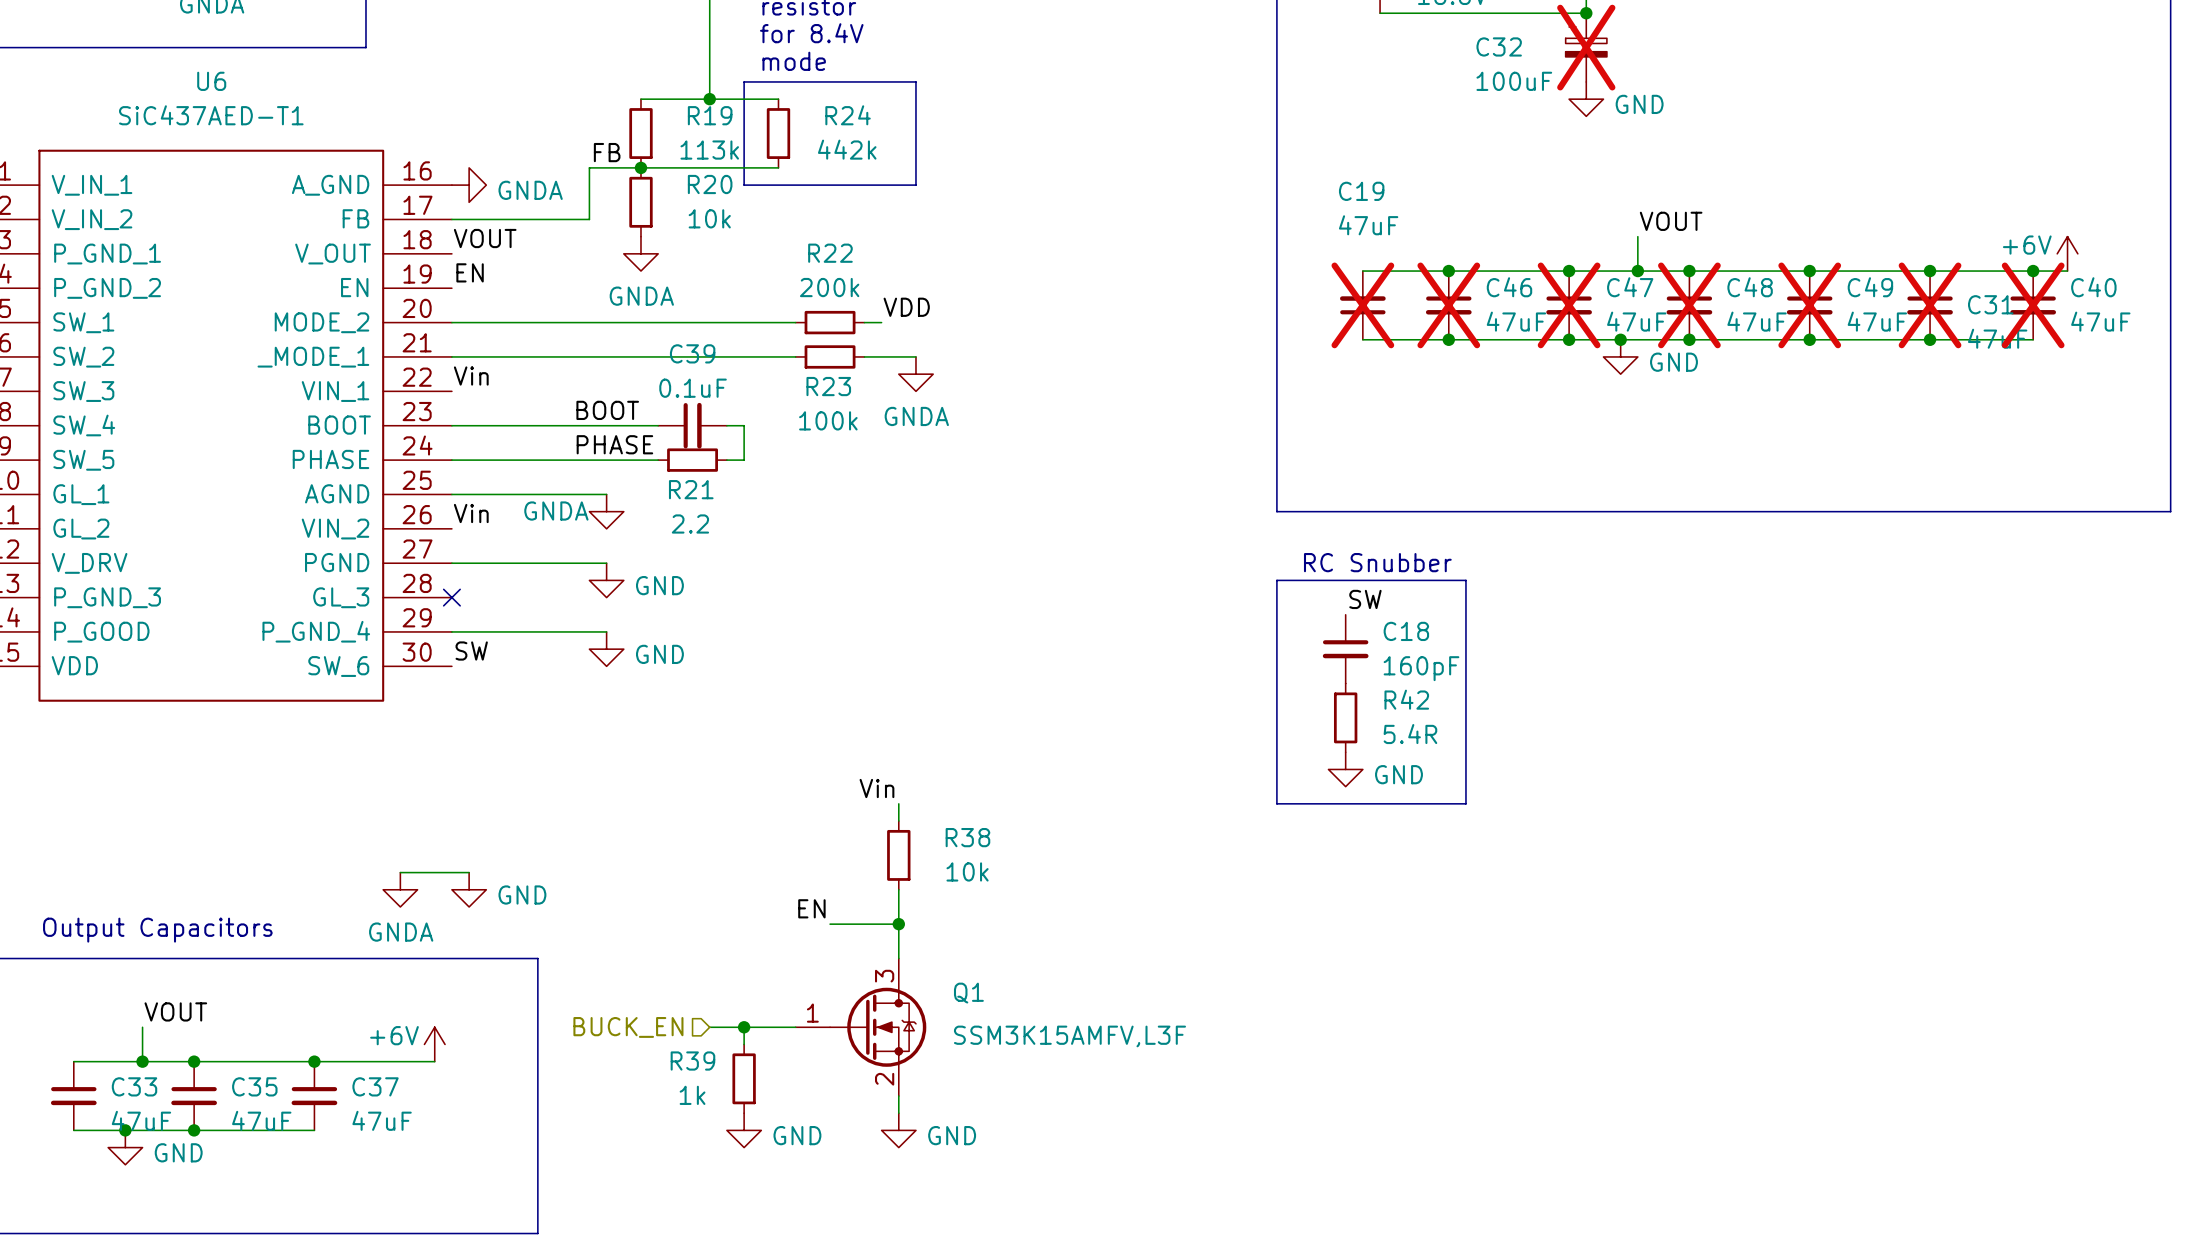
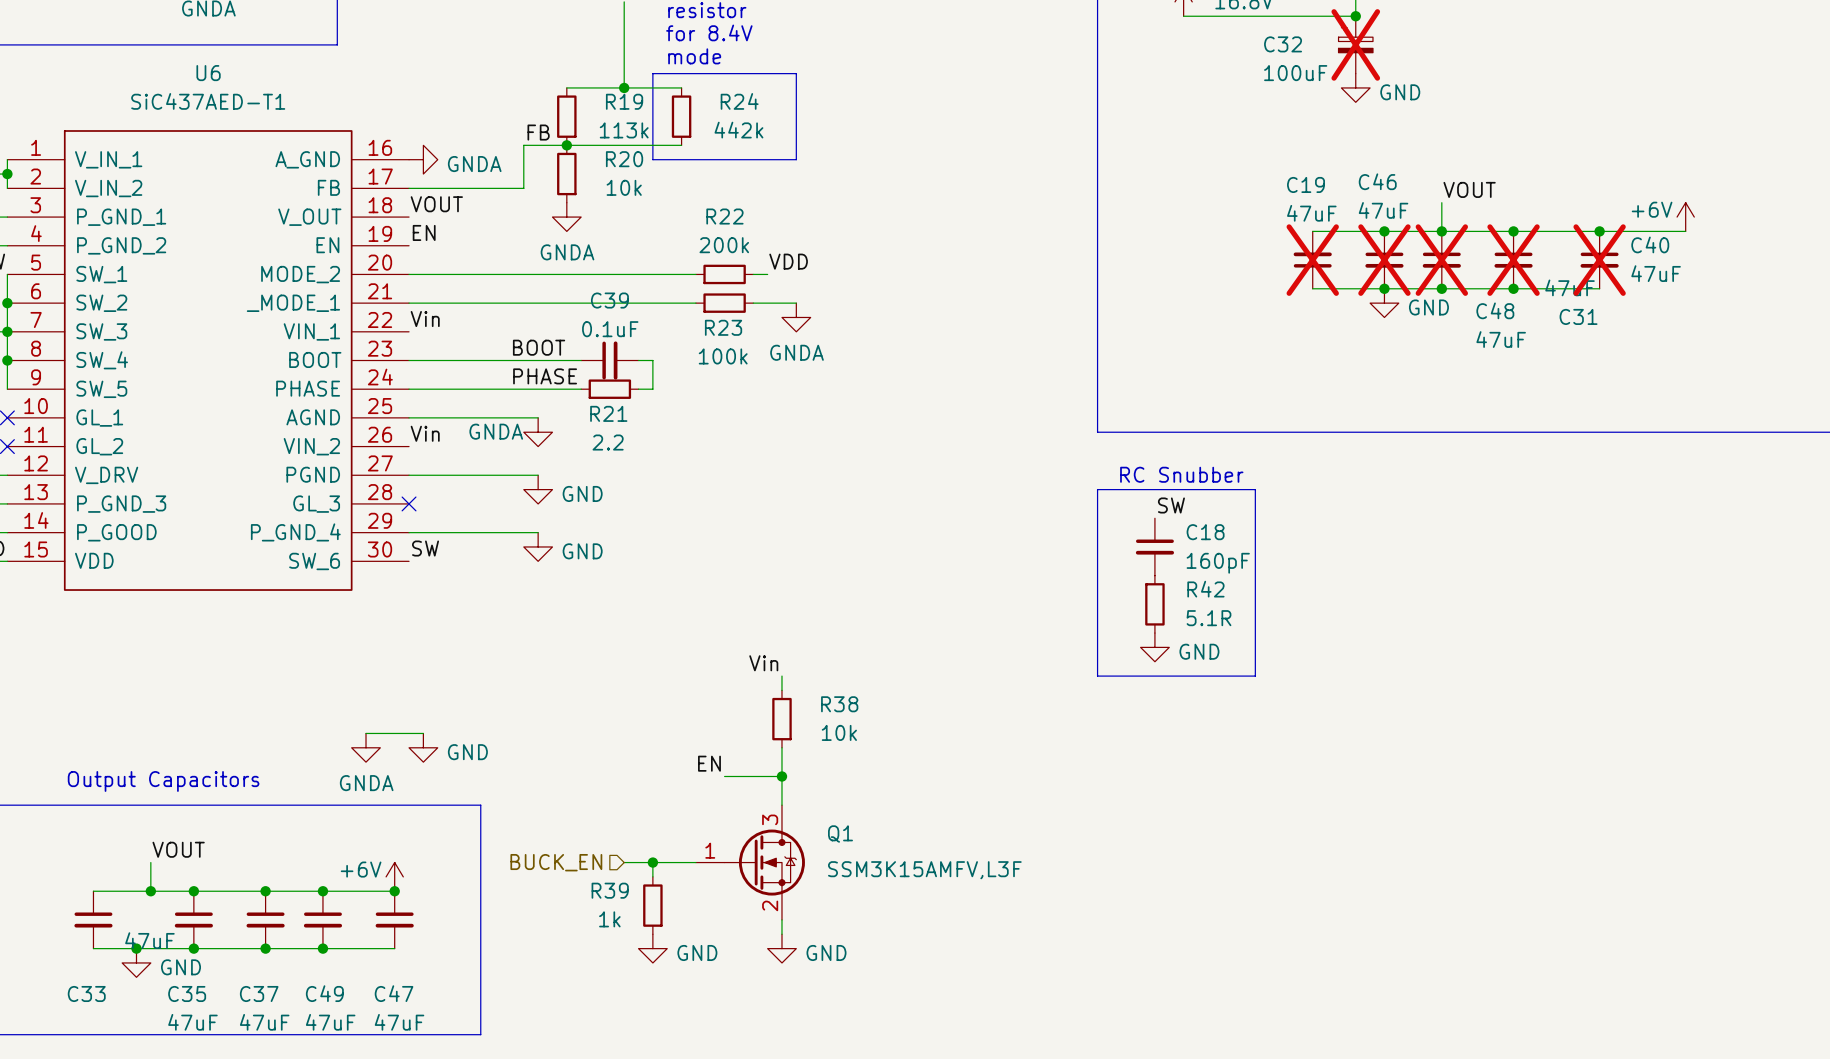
C19 name position: C19 (1361, 191) -> C19 (1306, 184)
label position: VOUT (1671, 221) -> VOUT (1469, 189)
C19 value position: 47uF (1368, 225) -> 47uF (1311, 213)
wire: (1637, 236) (1637, 271) -> (1441, 202) (1441, 231)
power symbol position: +6V (2067, 253) -> +6V (1685, 217)
wire: (1362, 271) (1534, 271) -> none
junction: (1448, 271) -> none
junction: (1569, 271) -> none
junction position: (1637, 271) -> (1384, 231)
junction: none -> (1513, 231)
junction: (1809, 271) -> none
junction: none -> (1599, 231)
junction: (1930, 271) -> none
wire: (1981, 271) (2067, 271) -> none
junction: (2033, 271) -> none
C46 name position: C46 (1509, 287) -> C46 (1377, 181)
C47 name position: C47 (1630, 287) -> C47 (394, 993)
C48 name position: C48 (1750, 287) -> C48 (1495, 310)
C49 name position: C49 (1870, 287) -> C49 (324, 993)
C31 name position: C31 (1990, 304) -> C31 (1578, 316)
C19 position: (1362, 305) -> (1312, 260)
C46 position: (1448, 305) -> (1384, 260)
C47 position: (1569, 305) -> (394, 919)
C47 do-not-place cross: (1569, 305) -> none
C49 position: (1809, 305) -> (322, 919)
C49 do-not-place cross: (1809, 305) -> none
C31 position: (1930, 305) -> (1513, 260)
C40 position: (2033, 305) -> (1599, 260)
C46 value position: 47uF (1516, 321) -> 47uF (1383, 210)
C47 value position: 47uF (1636, 321) -> 47uF (399, 1022)
C48 value position: 47uF (1757, 321) -> 47uF (1501, 339)
C49 value position: 47uF (1877, 321) -> 47uF (330, 1022)
wire: (1362, 339) (1534, 339) -> none
junction: (1448, 339) -> none
junction: (1569, 339) -> none
junction position: (1809, 339) -> (1513, 288)
wire: (1878, 339) (2033, 339) -> none
junction: (1930, 339) -> none
R42 value: 5.4R (1410, 734) -> 5.1R (1209, 618)
junction: none -> (265, 891)
junction: (314, 1061) -> none
junction: none -> (322, 891)
junction: none -> (394, 891)
C33 name position: C33 (134, 1086) -> C33 (86, 993)
C35 name position: C35 (254, 1086) -> C35 (187, 993)
C37 name position: C37 (375, 1086) -> C37 (259, 993)
C37 position: (314, 1096) -> (265, 919)
C35 value position: 47uF (261, 1120) -> 47uF (192, 1022)
C37 value position: 47uF (382, 1120) -> 47uF (264, 1022)
junction: none -> (265, 948)
wire: none -> (294, 948) (394, 948)
junction: none -> (322, 948)

